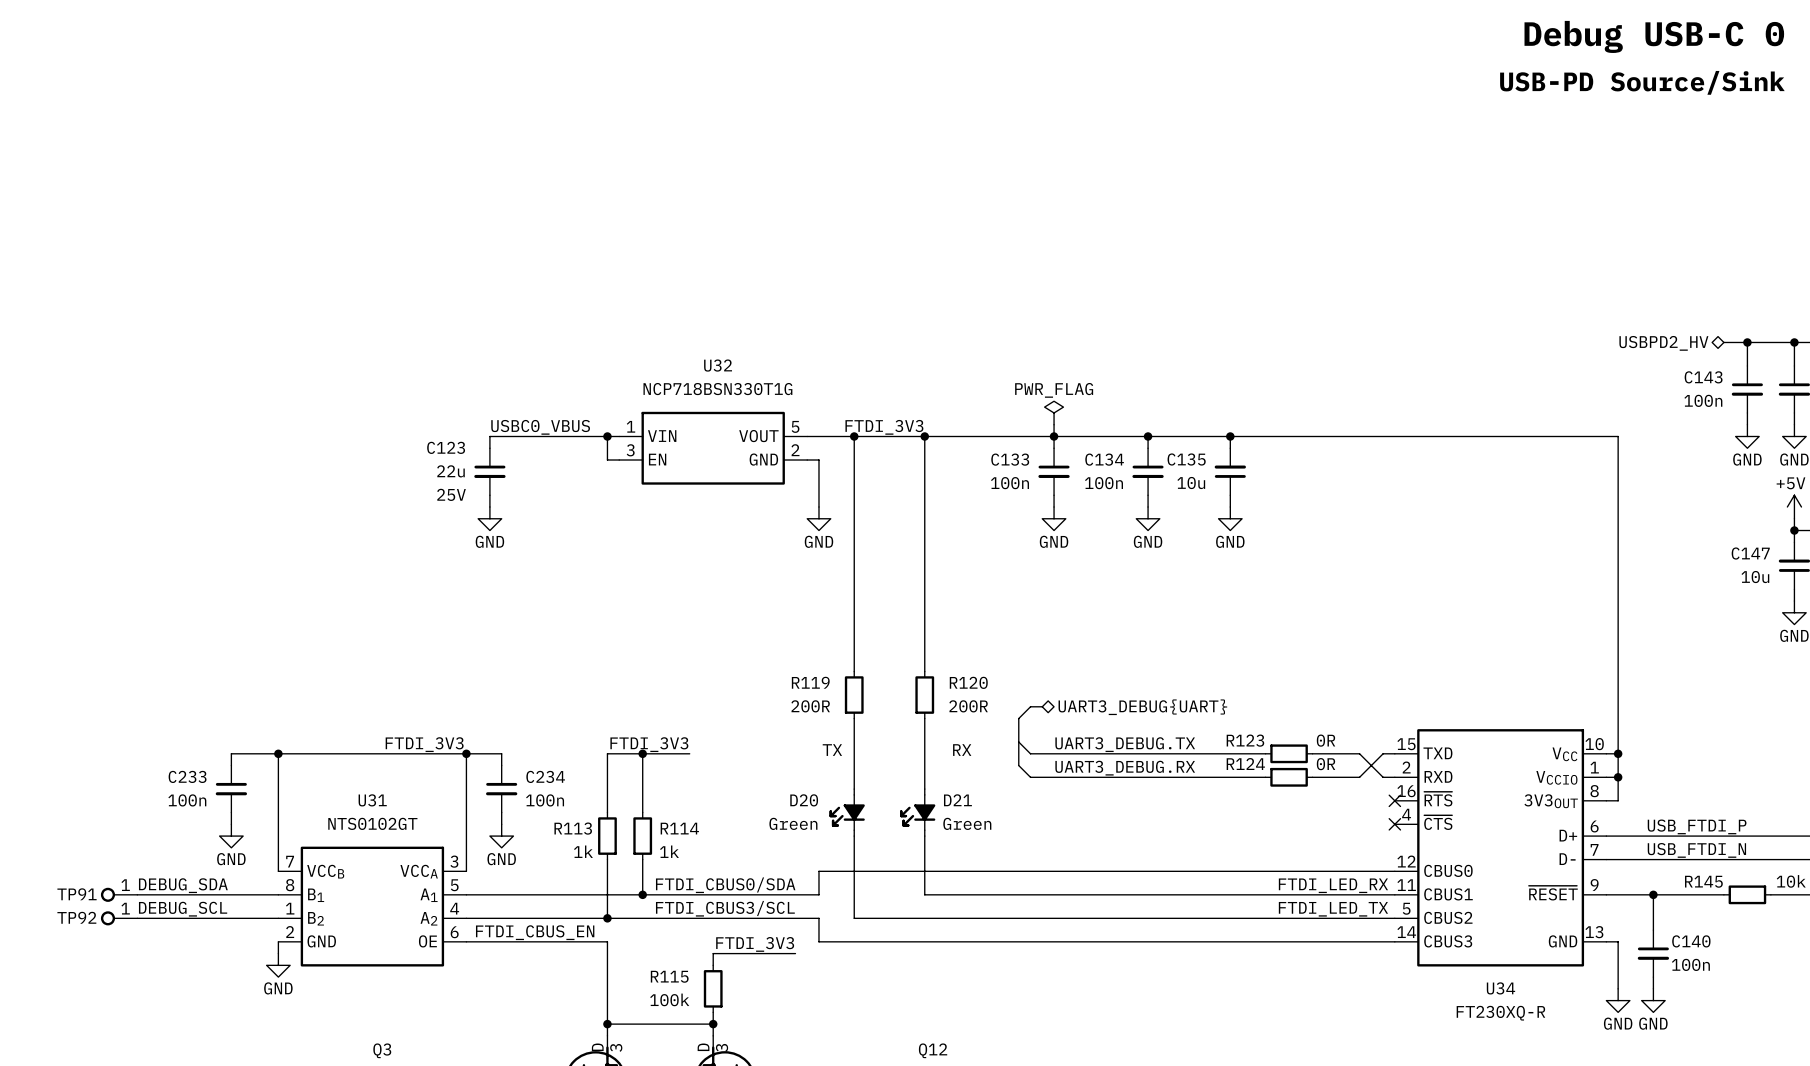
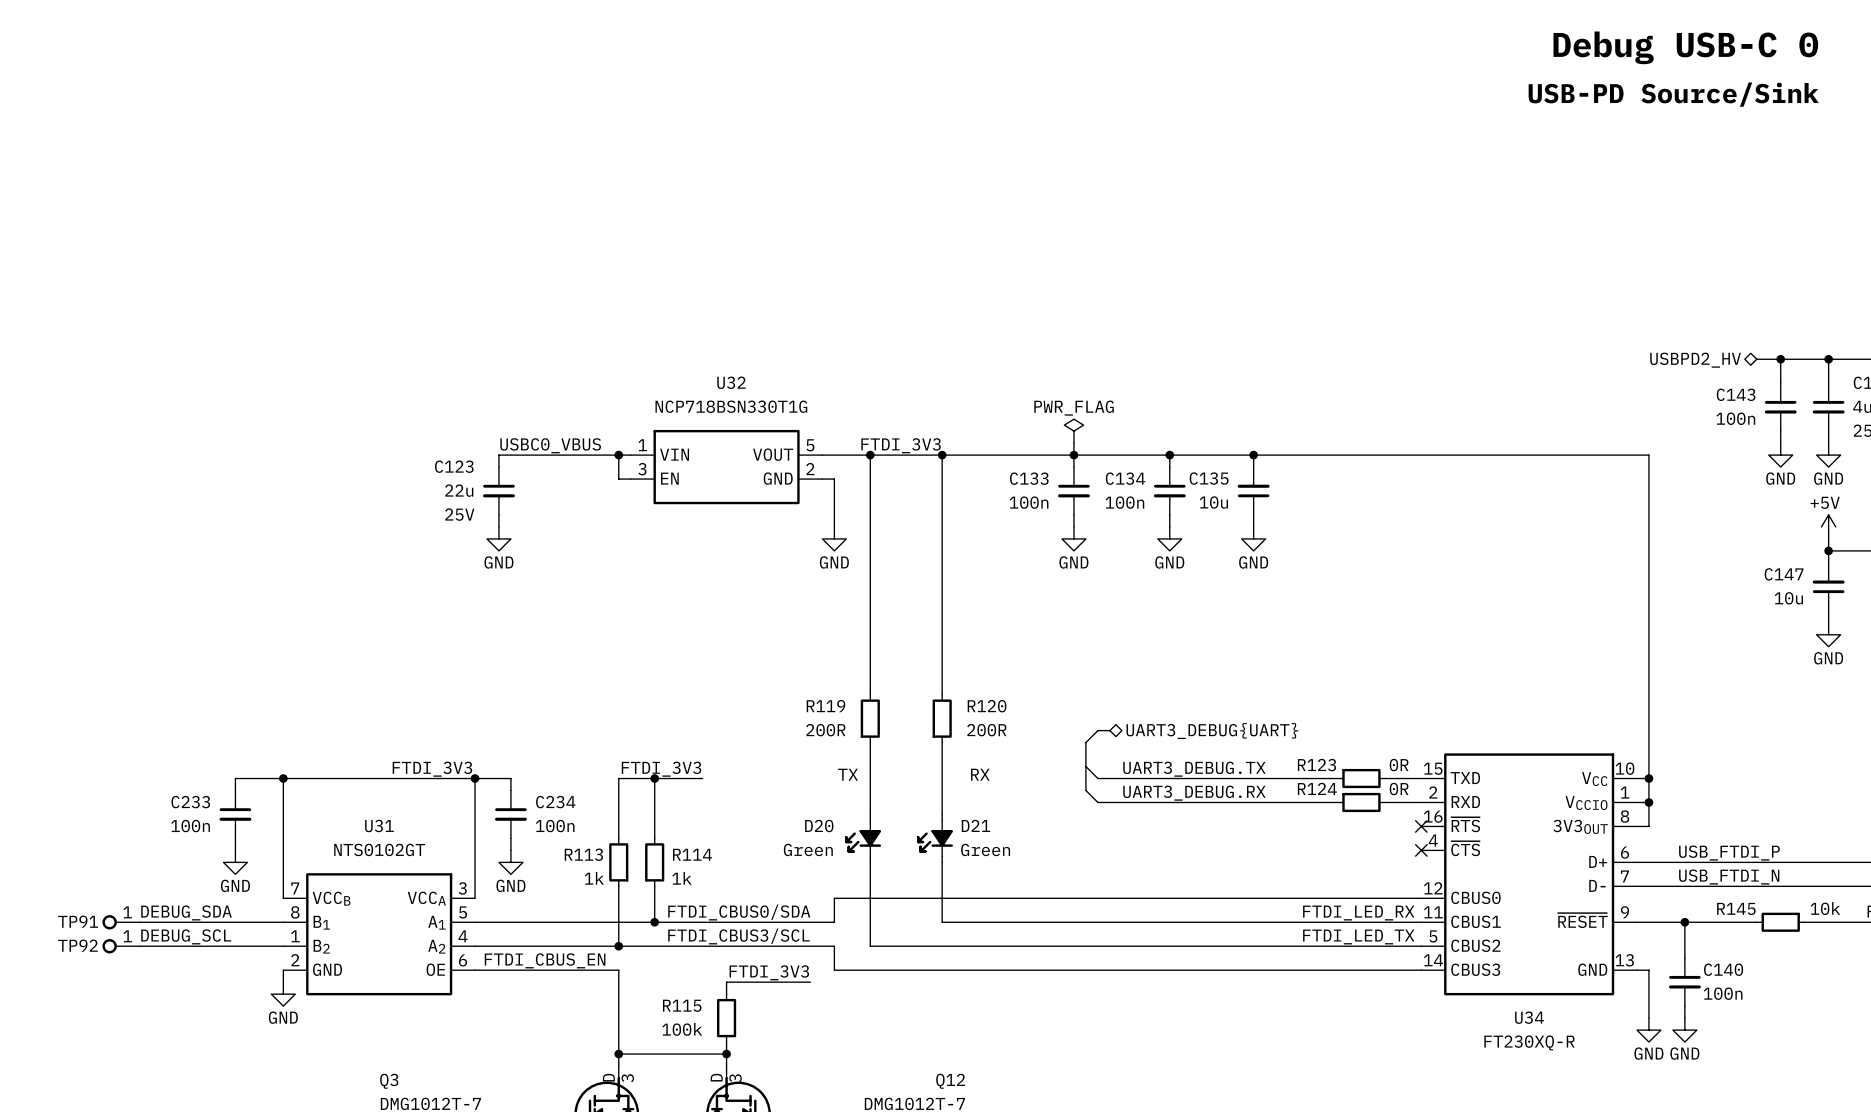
bus: (1042, 706) (1030, 706) (1018, 718) (1018, 765) -> (1109, 730) (1097, 730) (1085, 742) (1085, 790)
hierarchical label position: UART3_DEBUG{UART} (1142, 707) -> UART3_DEBUG{UART} (1212, 731)
wire: (1018, 742) (1030, 753) (1077, 753) -> (1085, 766) (1097, 778)
label position: UART3_DEBUG.TX (1125, 744) -> UART3_DEBUG.TX (1194, 769)
wire: none -> (1289, 778) (1337, 778)
R123 position: (1289, 753) -> (1361, 778)
wire: (1312, 753) (1359, 753) (1383, 777) -> (1385, 802) (1409, 802)
wire: (1383, 753) (1359, 777) (1312, 777) -> (1409, 778) (1385, 778)
wire: (1018, 765) (1030, 777) (1077, 777) -> (1085, 790) (1097, 802)
label position: UART3_DEBUG.RX (1125, 768) -> UART3_DEBUG.RX (1194, 793)
wire: none -> (1289, 802) (1337, 802)
R124 position: (1289, 777) -> (1361, 802)

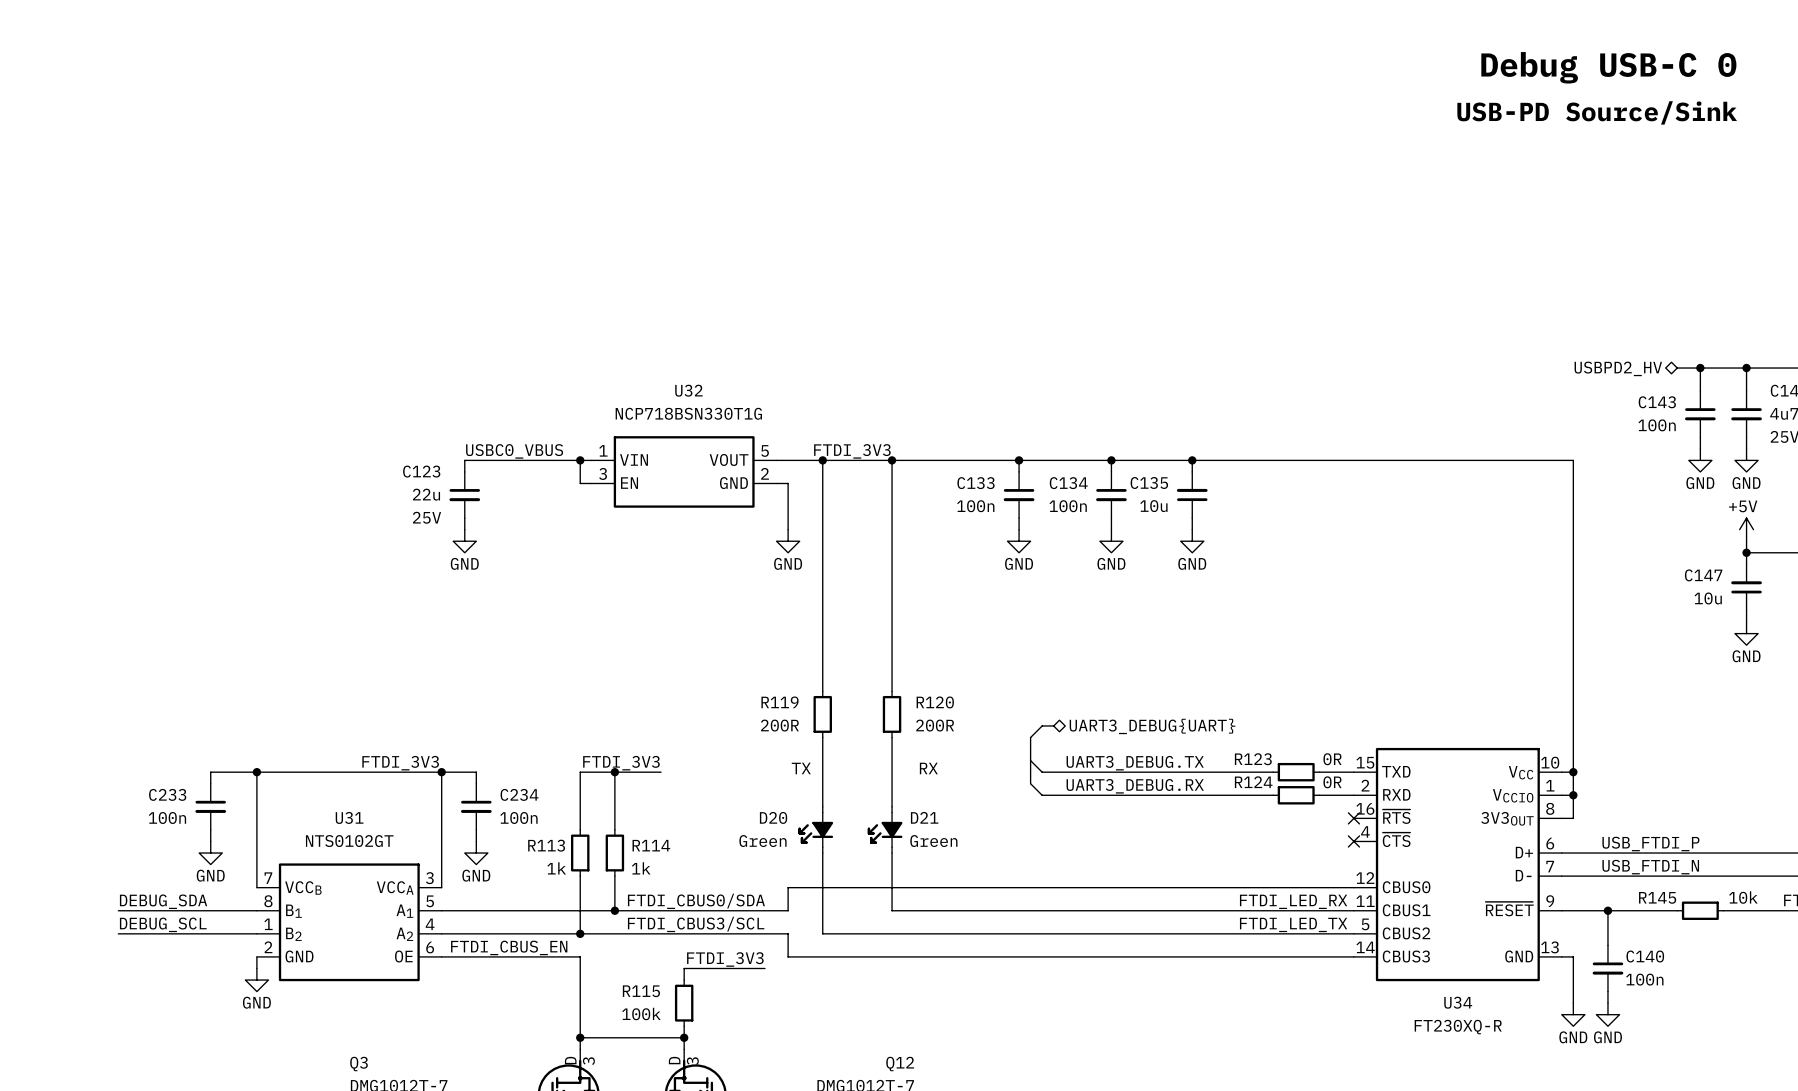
power symbol: PWR_FLAG (1073, 431) -> none
wire: (1073, 443) (1073, 455) -> none
TP91: (121, 922) -> none
TP92: (121, 946) -> none

